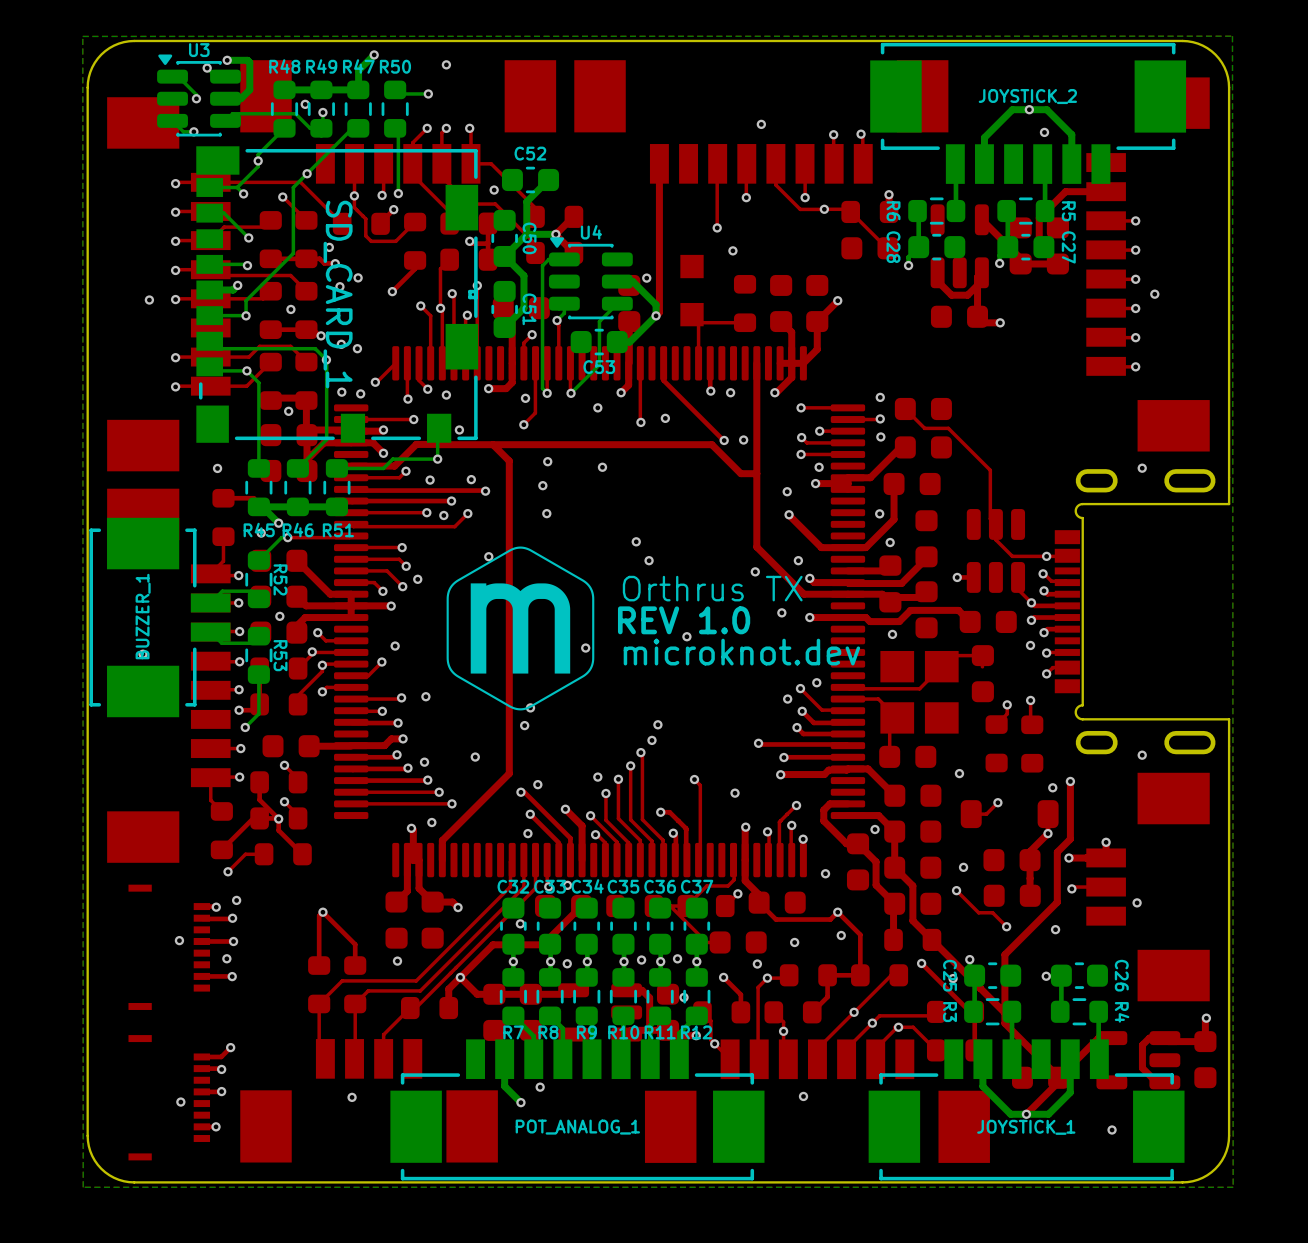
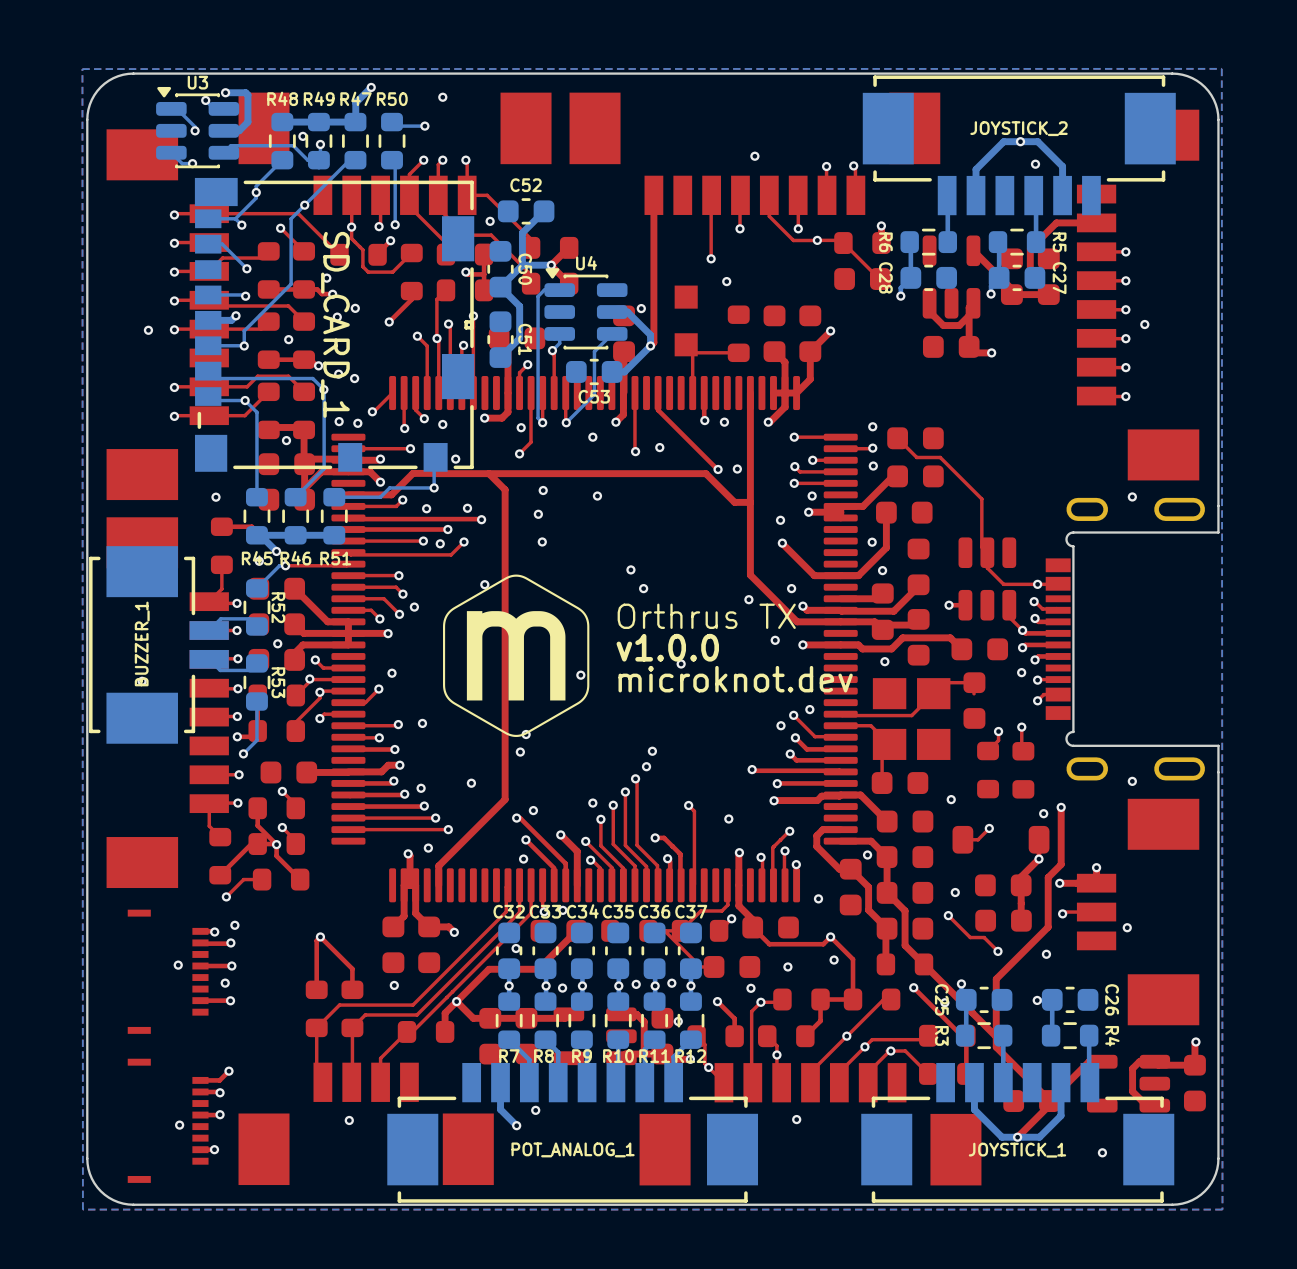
Orthrus TX value: REV 1.0 (684, 620) -> v1.0.0 (667, 647)

